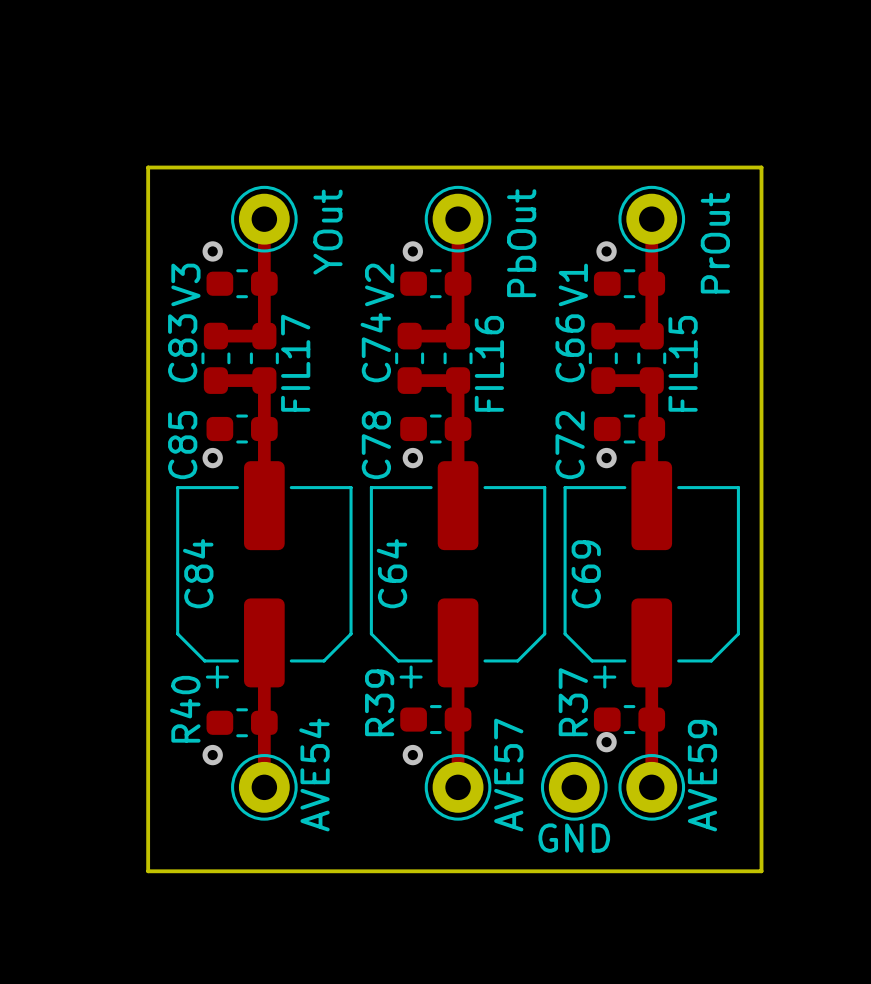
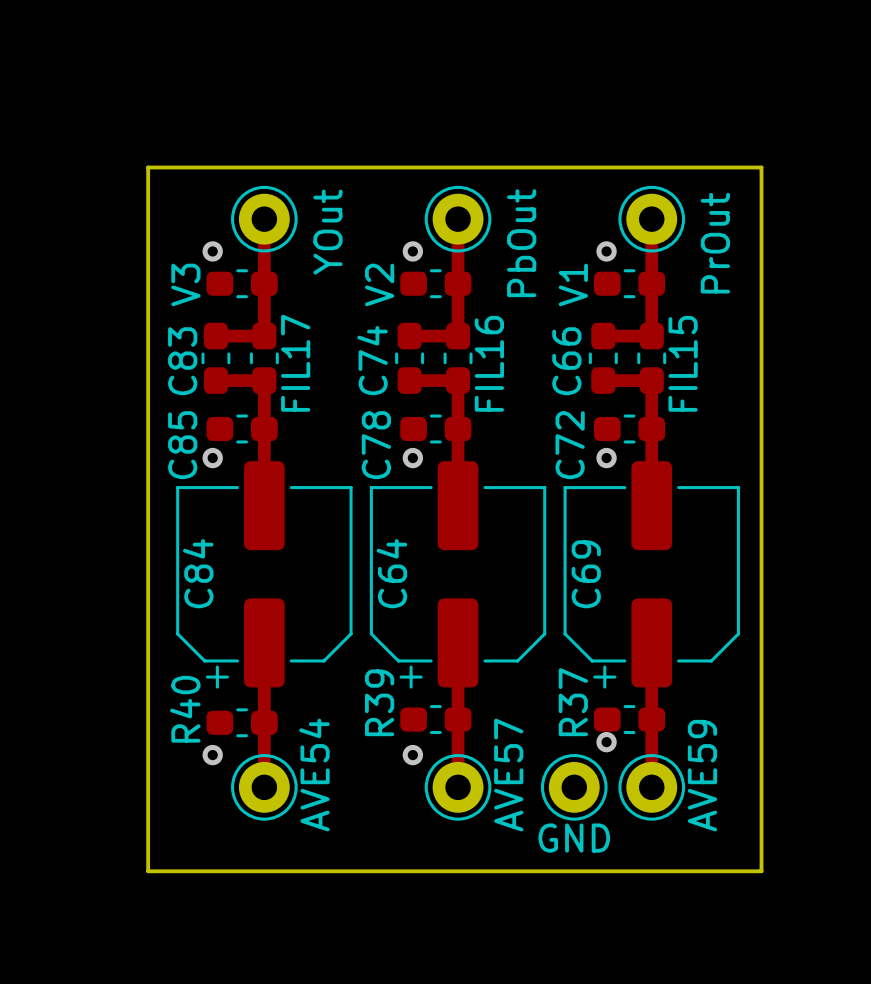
C74 name position: C74 (375, 347) -> C74 (372, 360)
C83 name position: C83 (182, 348) -> C83 (182, 361)
C66 name position: C66 (570, 348) -> C66 (566, 361)

